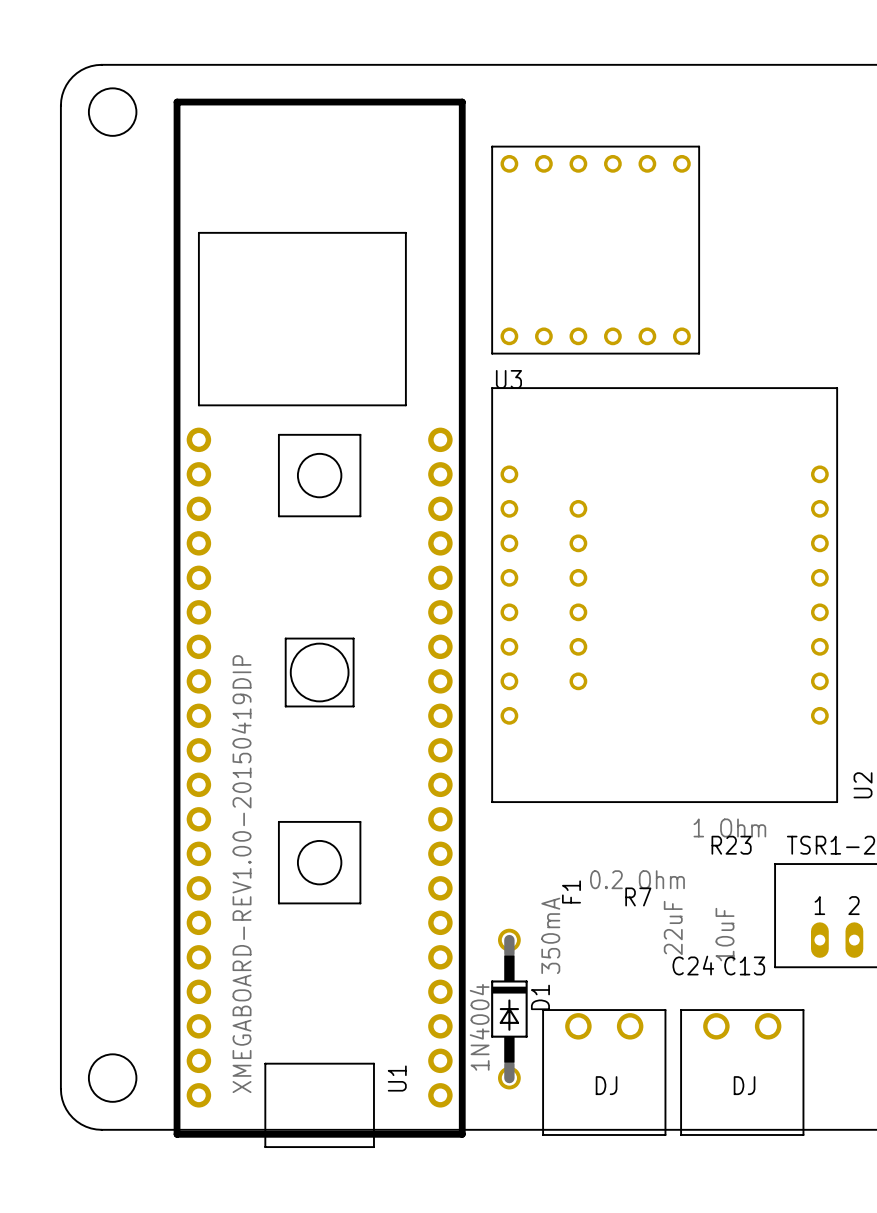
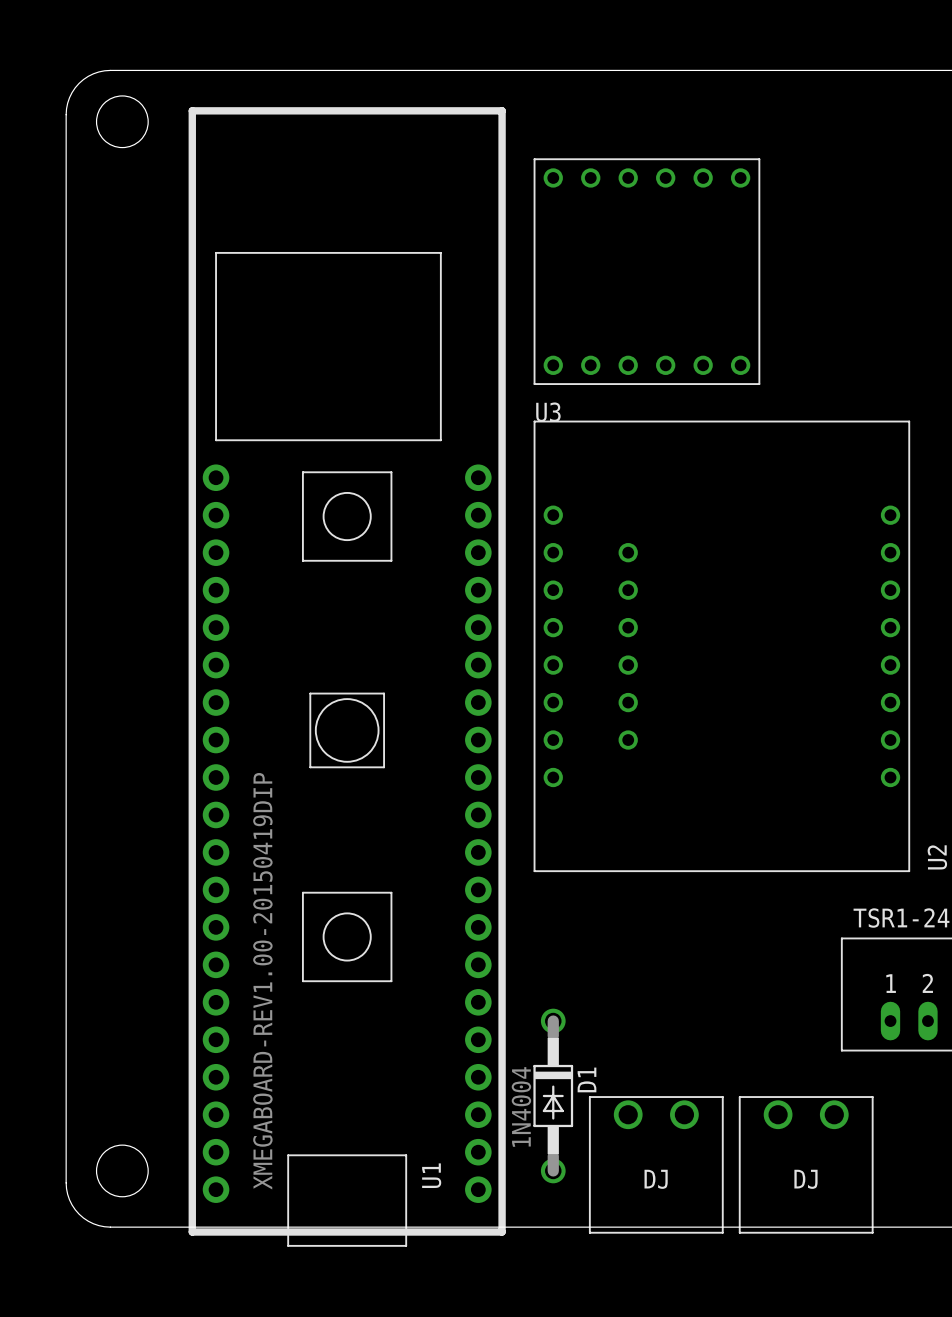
R23: 1 Ohm (729, 836) -> none
R7: 0.2 Ohm (637, 888) -> none
F1: 350mA (561, 927) -> none
C24: 22uF (688, 938) -> none
C13: 10uF (740, 941) -> none

